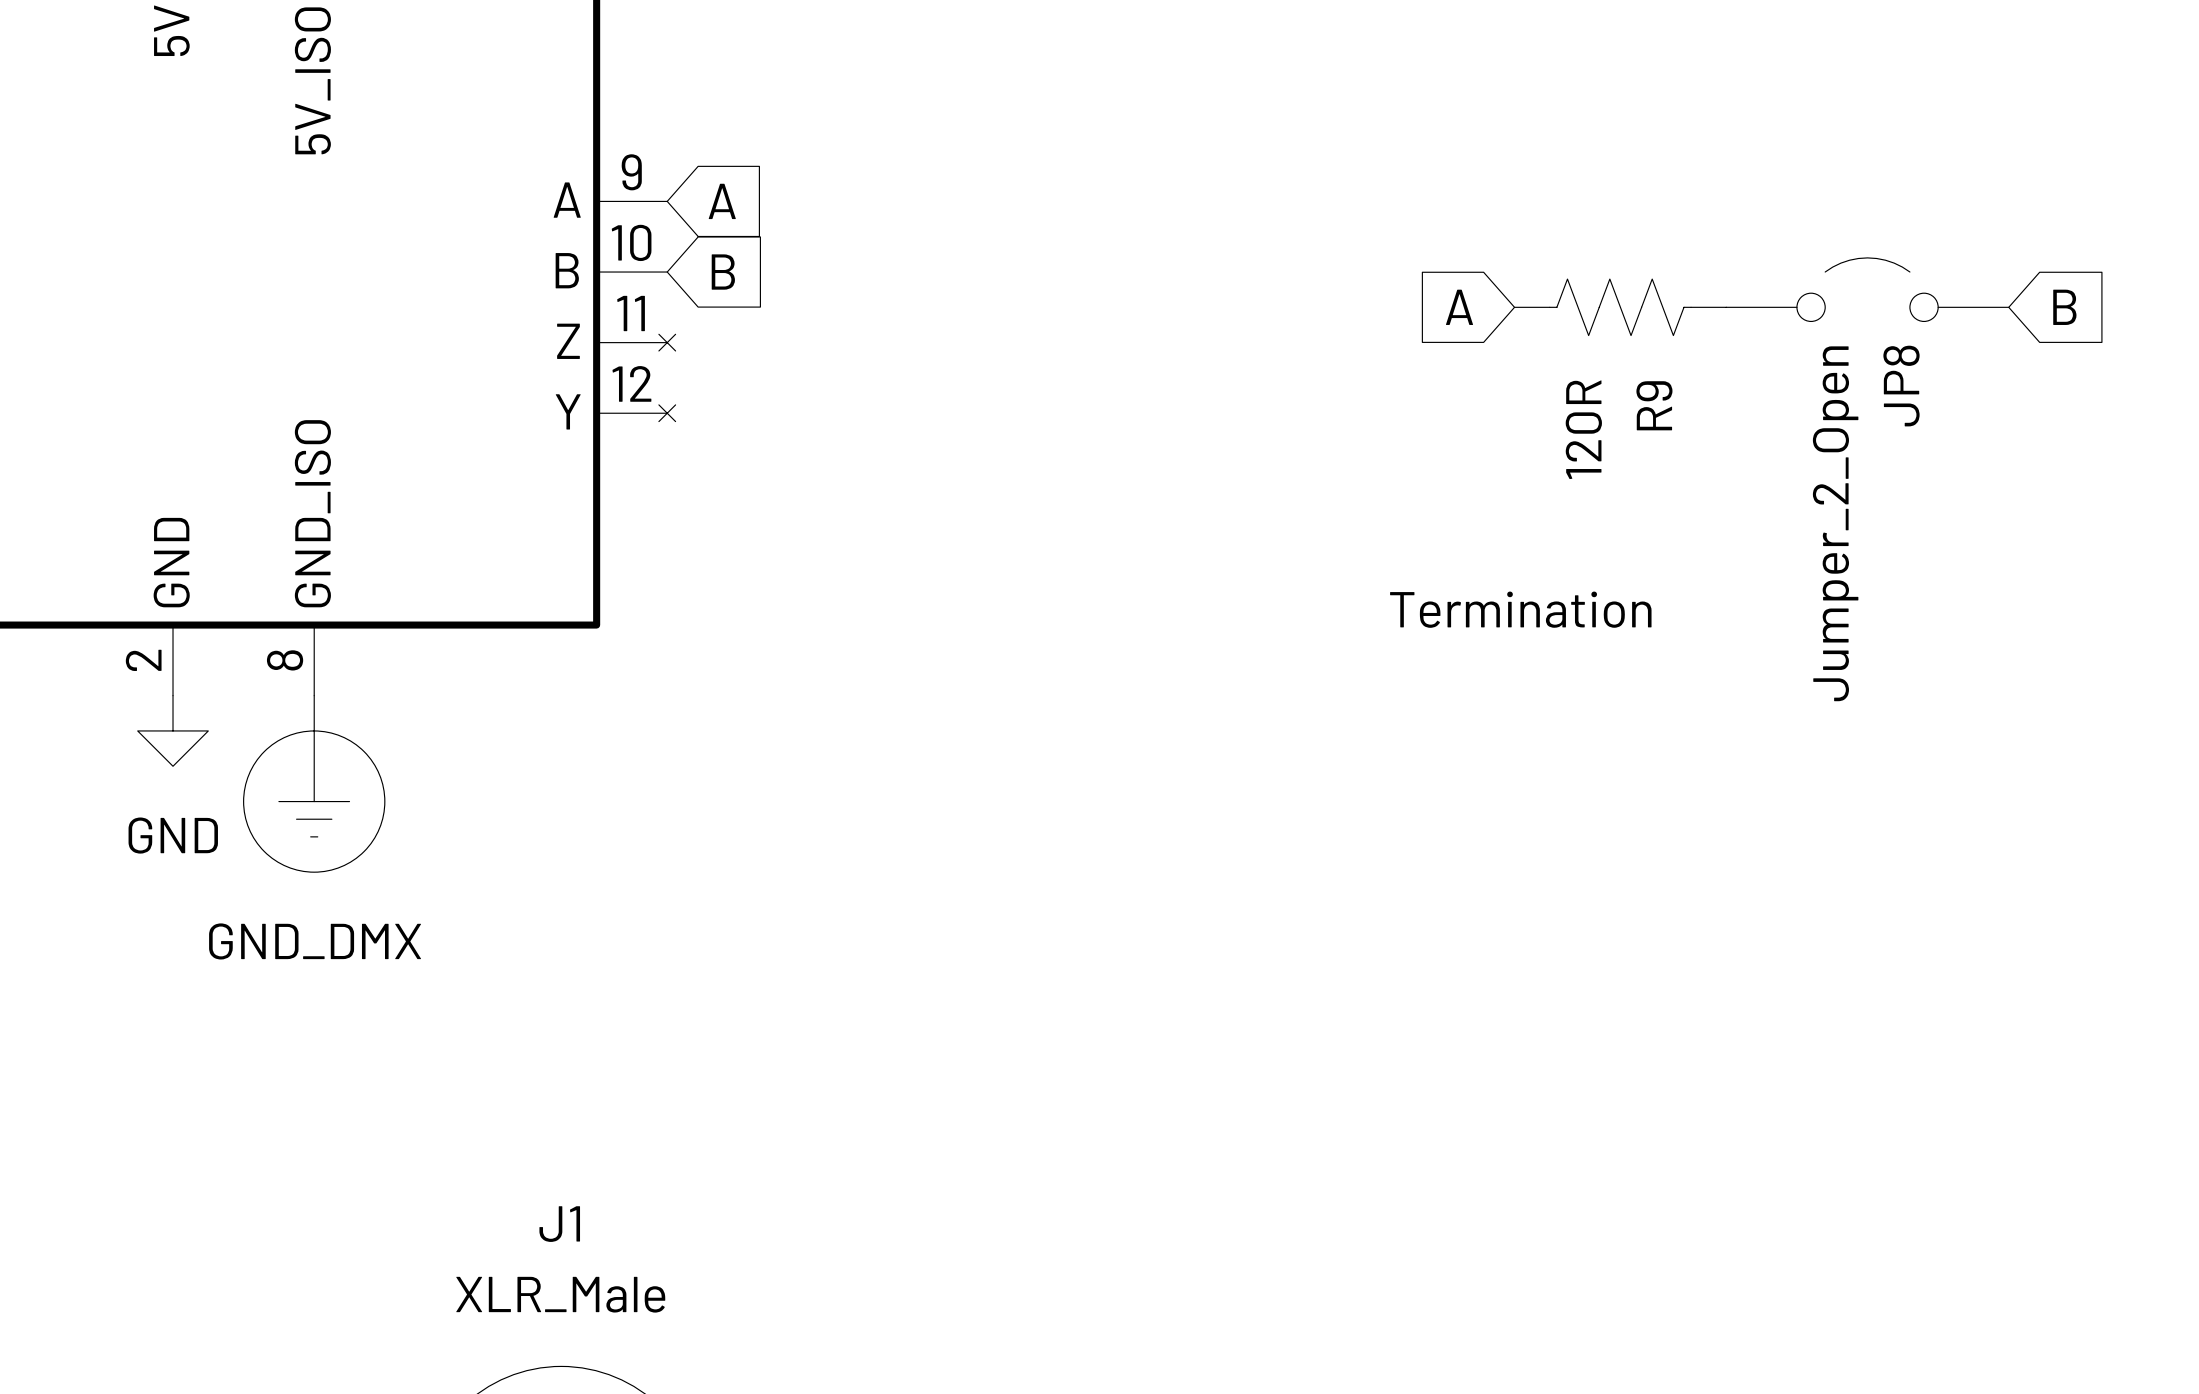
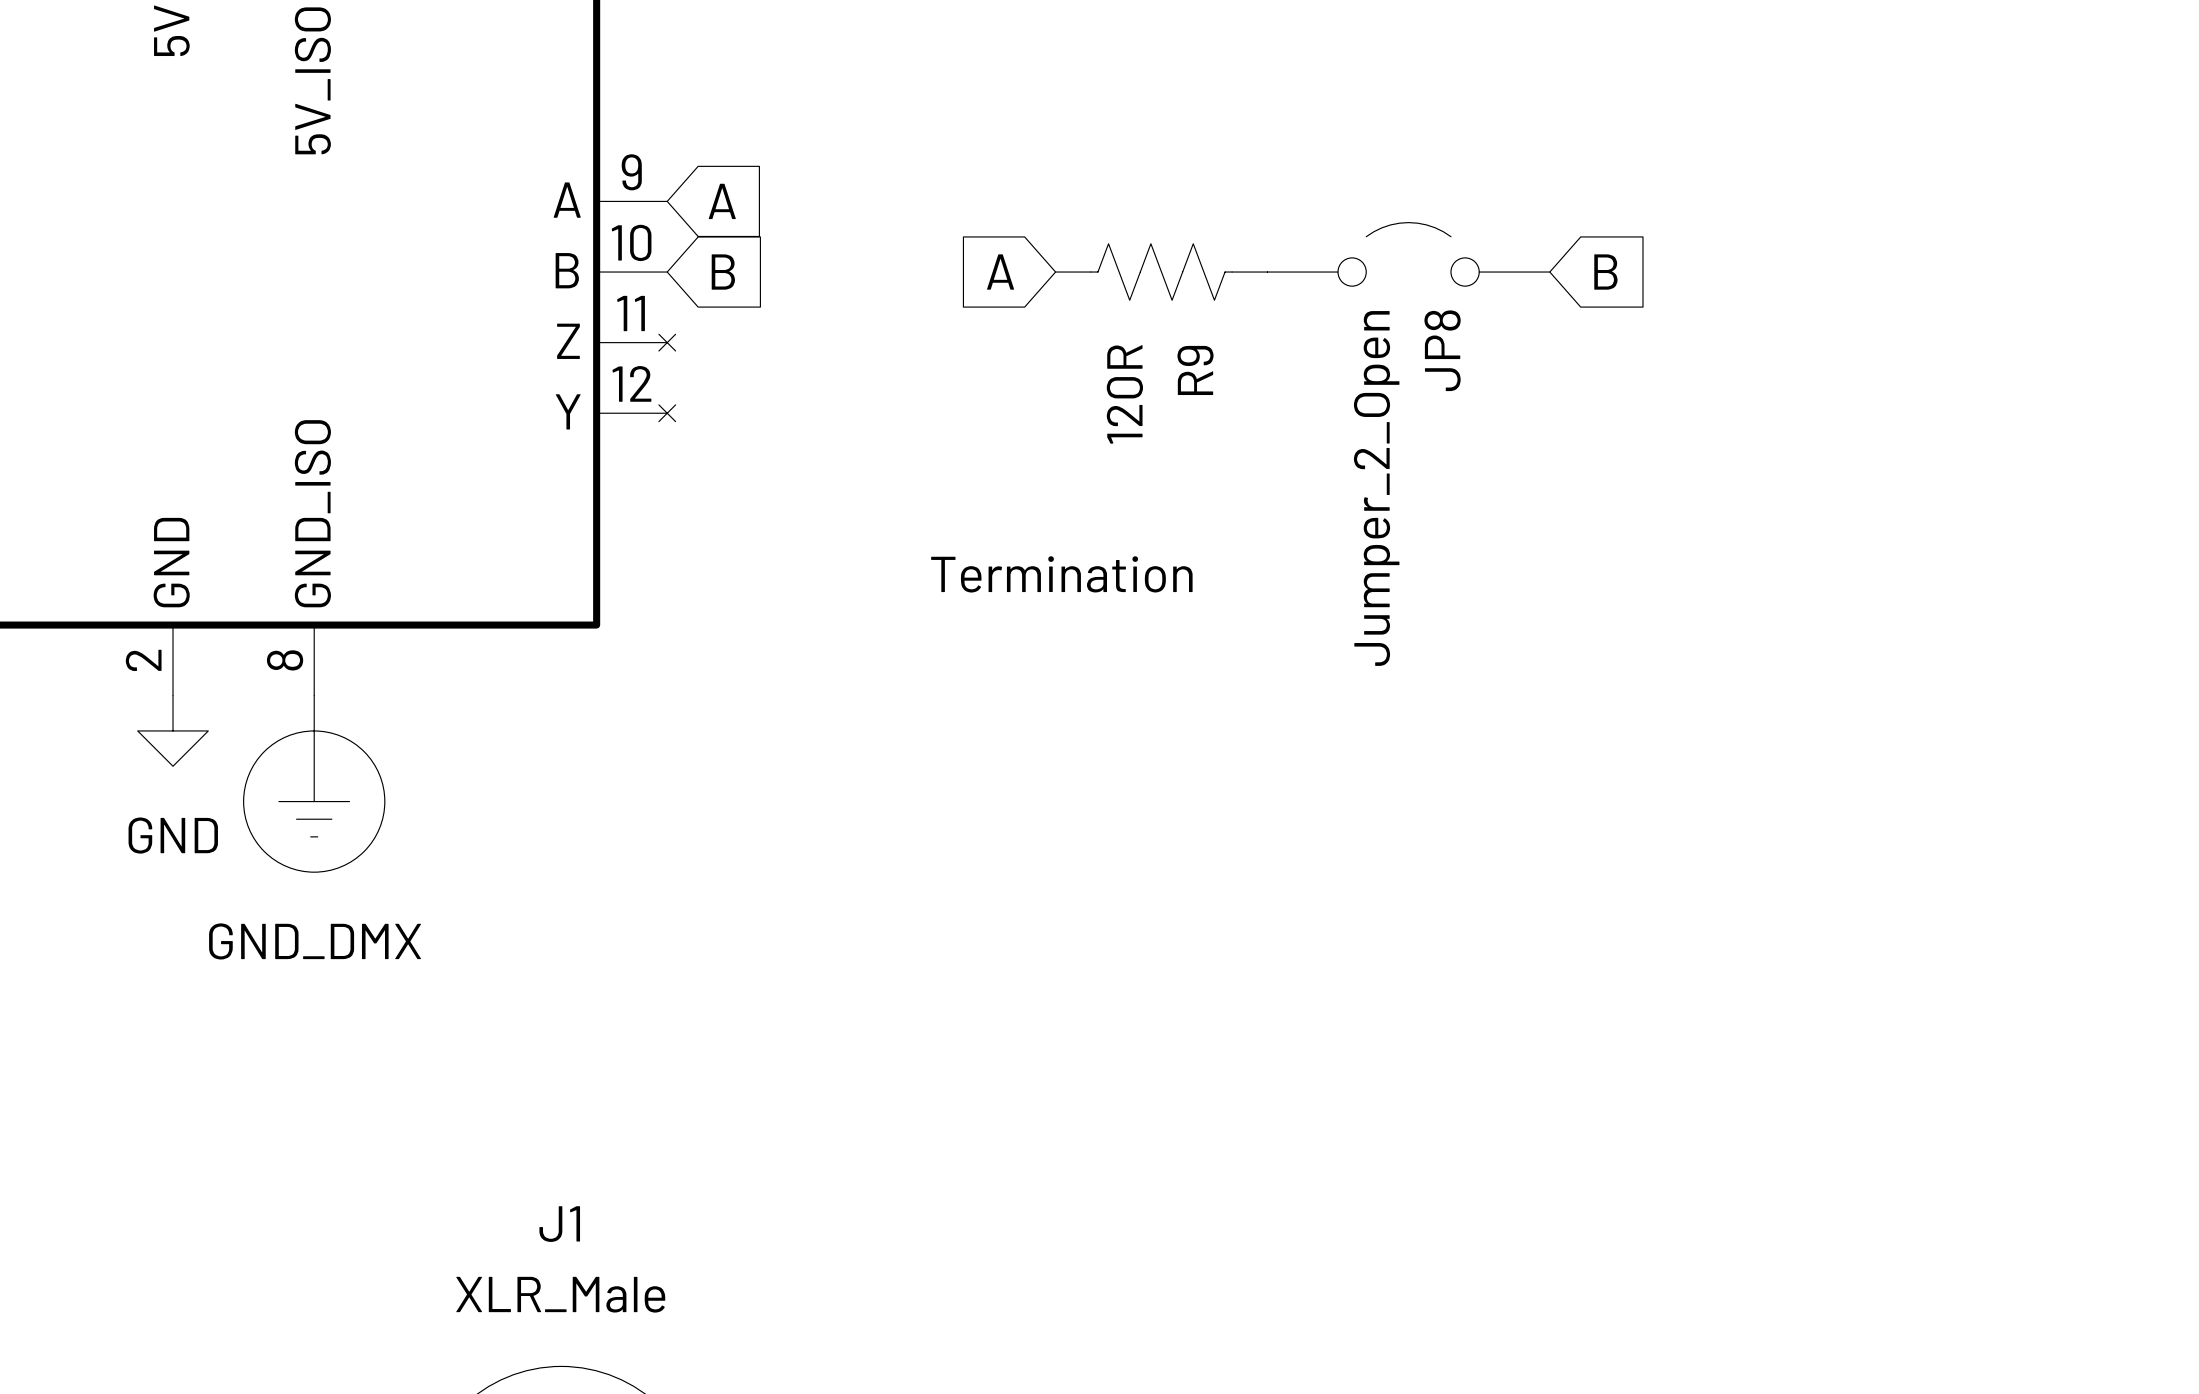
JP8 position: (1867, 289) -> (1408, 254)
global label position: A (1459, 307) -> A (1000, 272)
R9 position: (1620, 307) -> (1161, 272)
global label position: B (2064, 307) -> B (1605, 272)
text position: Termination (1520, 609) -> Termination (1061, 574)

